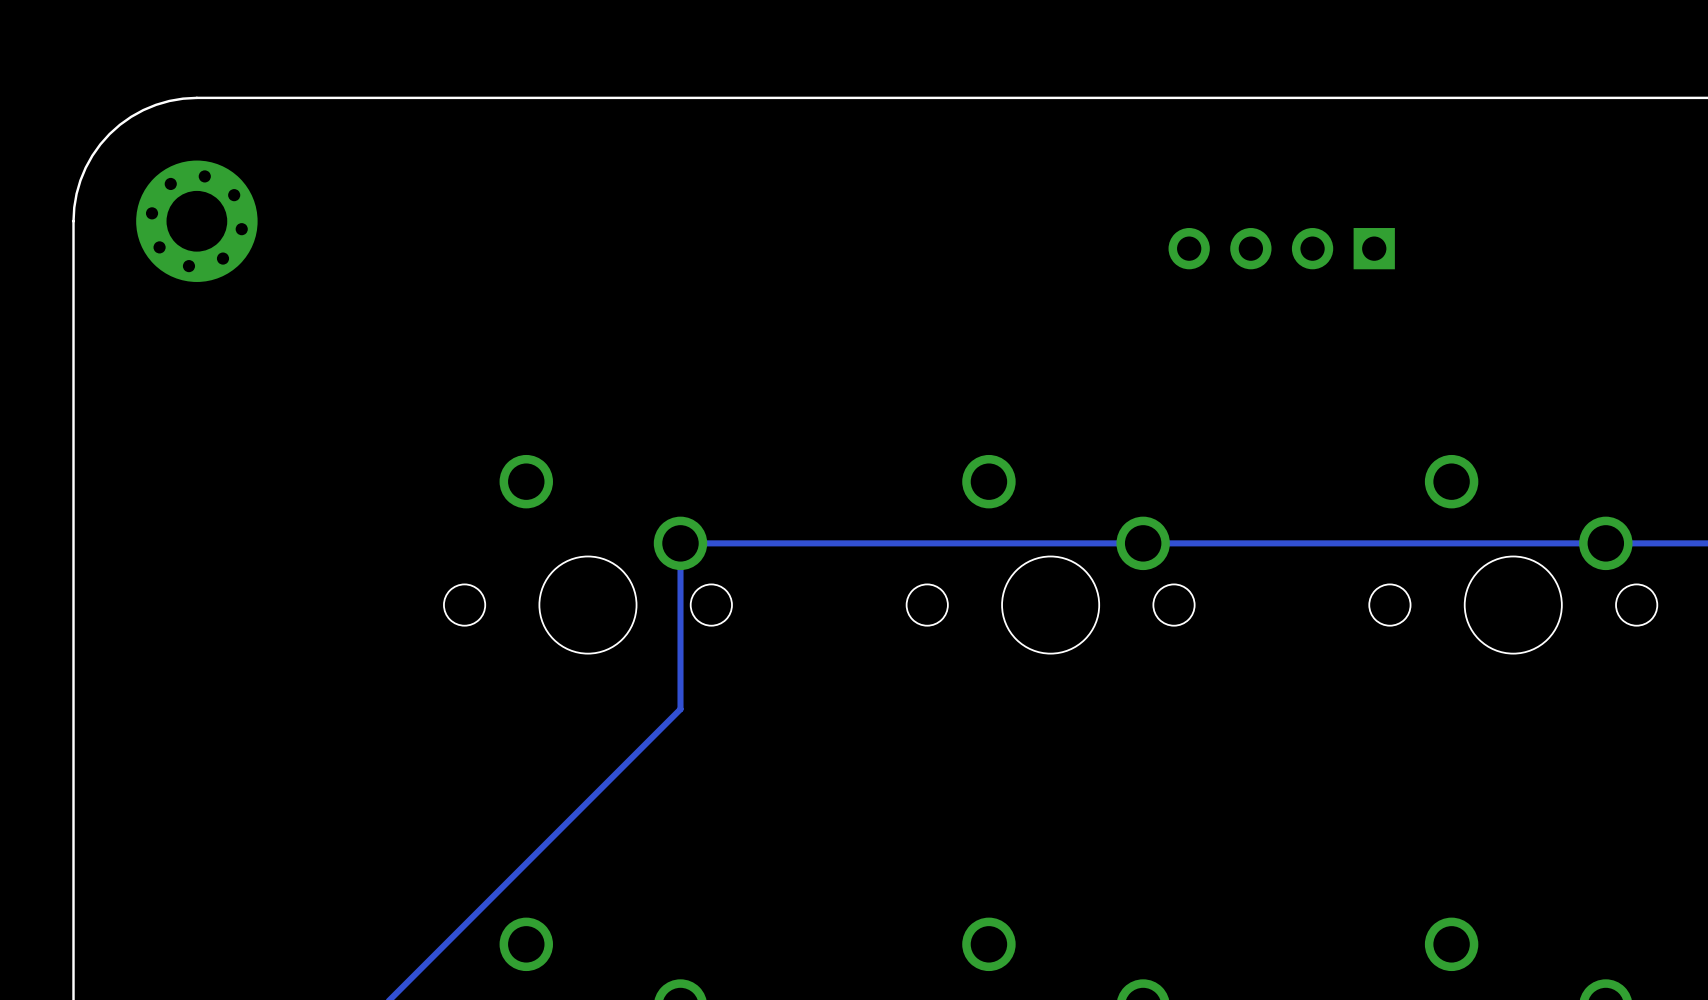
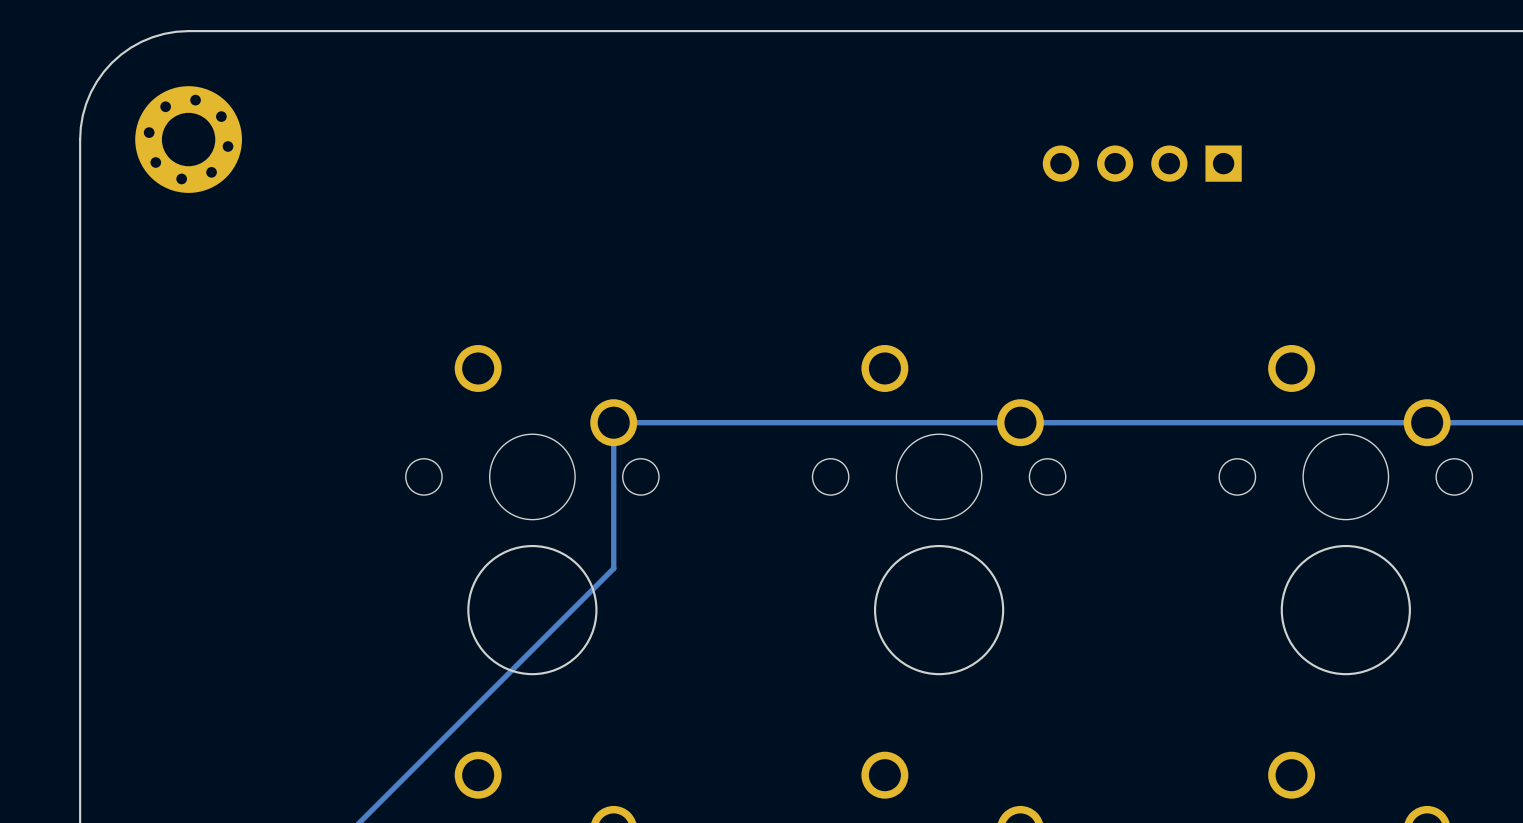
round board edge: none -> [467, 544, 598, 676]
round board edge: none -> [873, 544, 1005, 676]
round board edge: none -> [1280, 544, 1411, 676]

